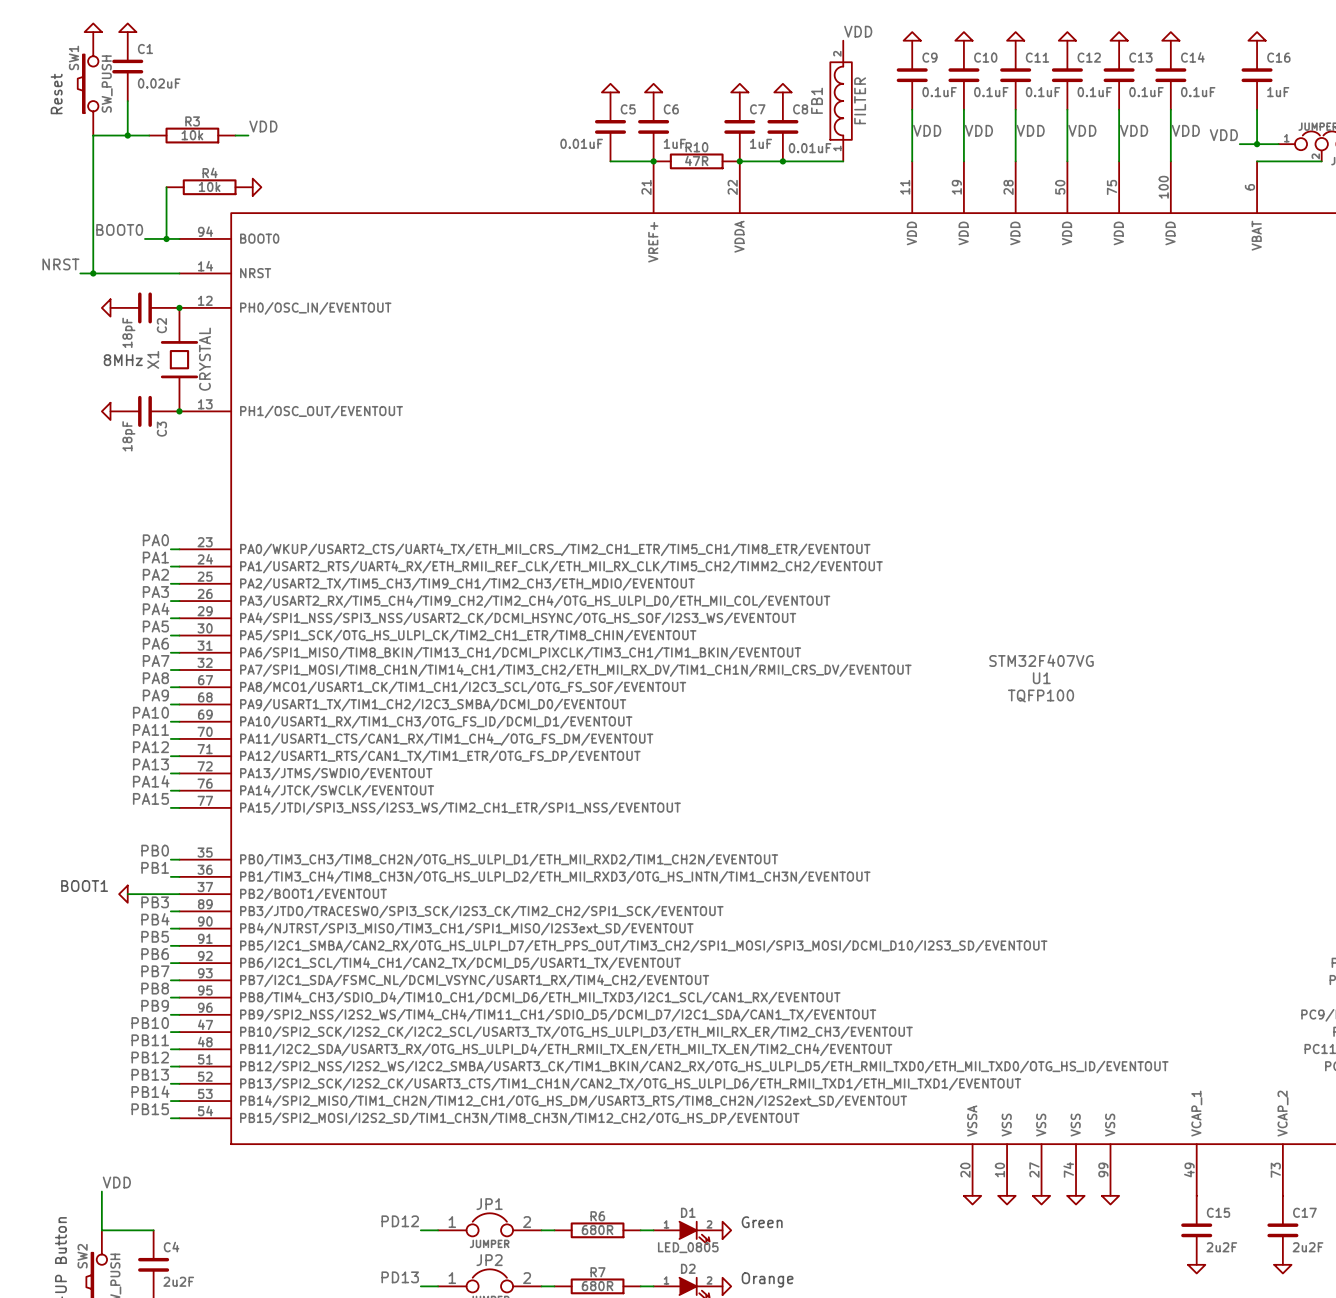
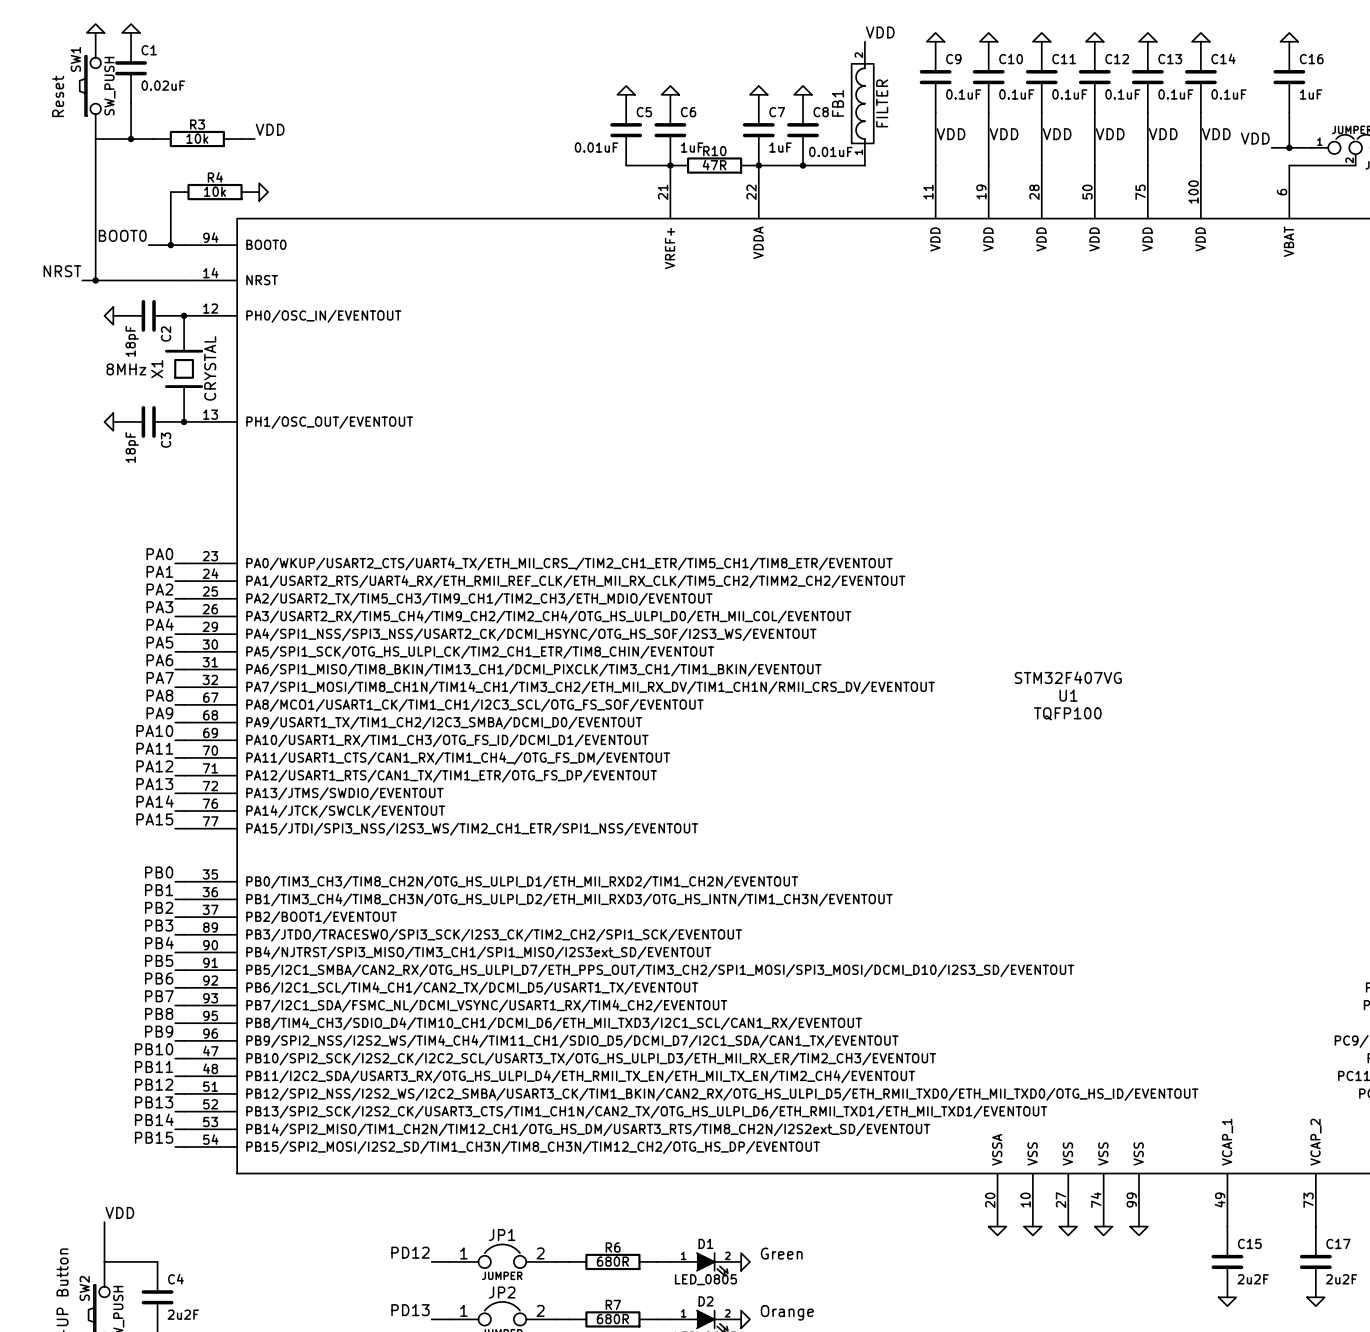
label: none -> PB2 (159, 907)
text: BOOT1 (84, 886) -> none
power symbol: (123, 894) -> none
wire: (127, 894) (170, 894) -> none

